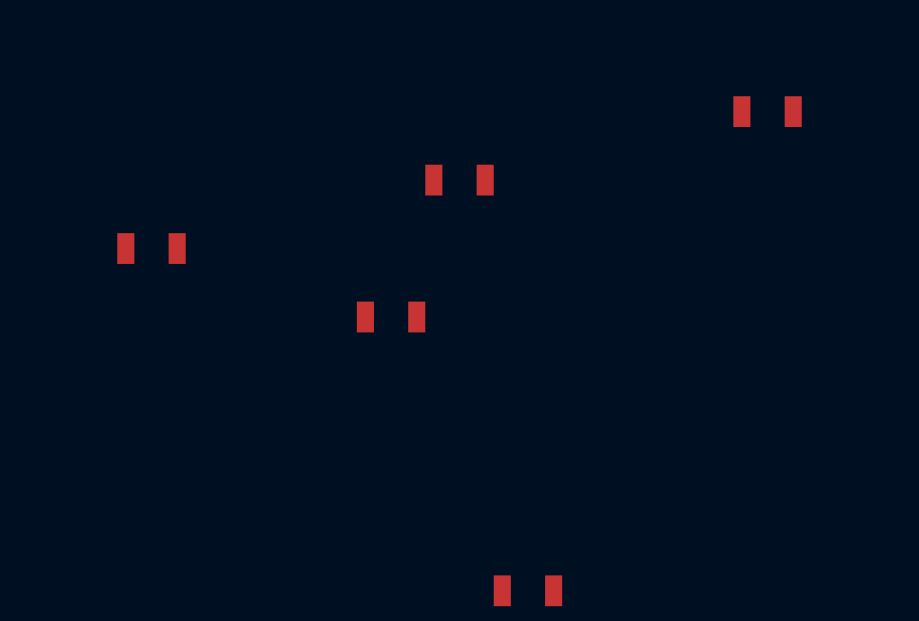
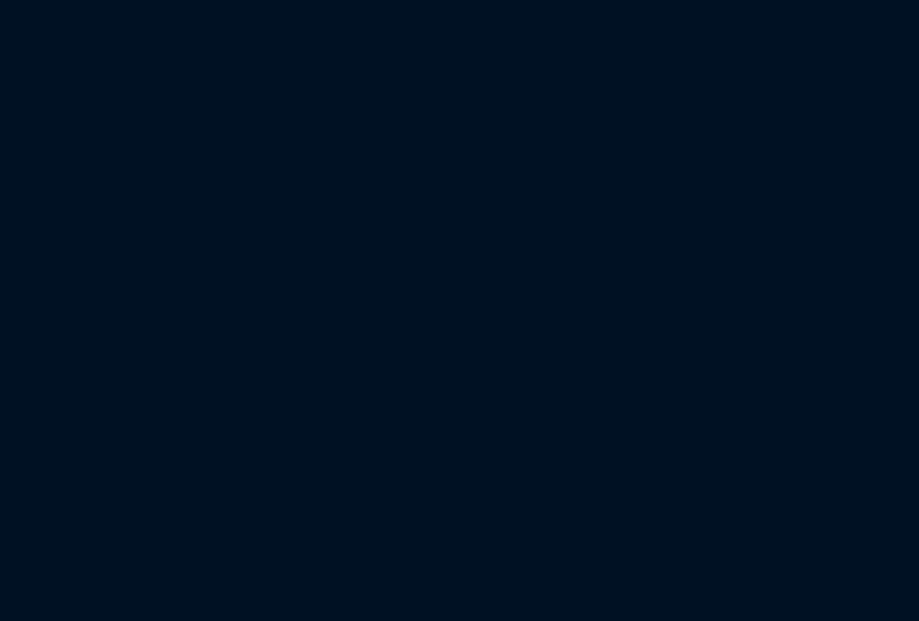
part: (767, 111) -> none
part: (459, 180) -> none
part: (151, 248) -> none
part: (391, 316) -> none
part: (527, 590) -> none

